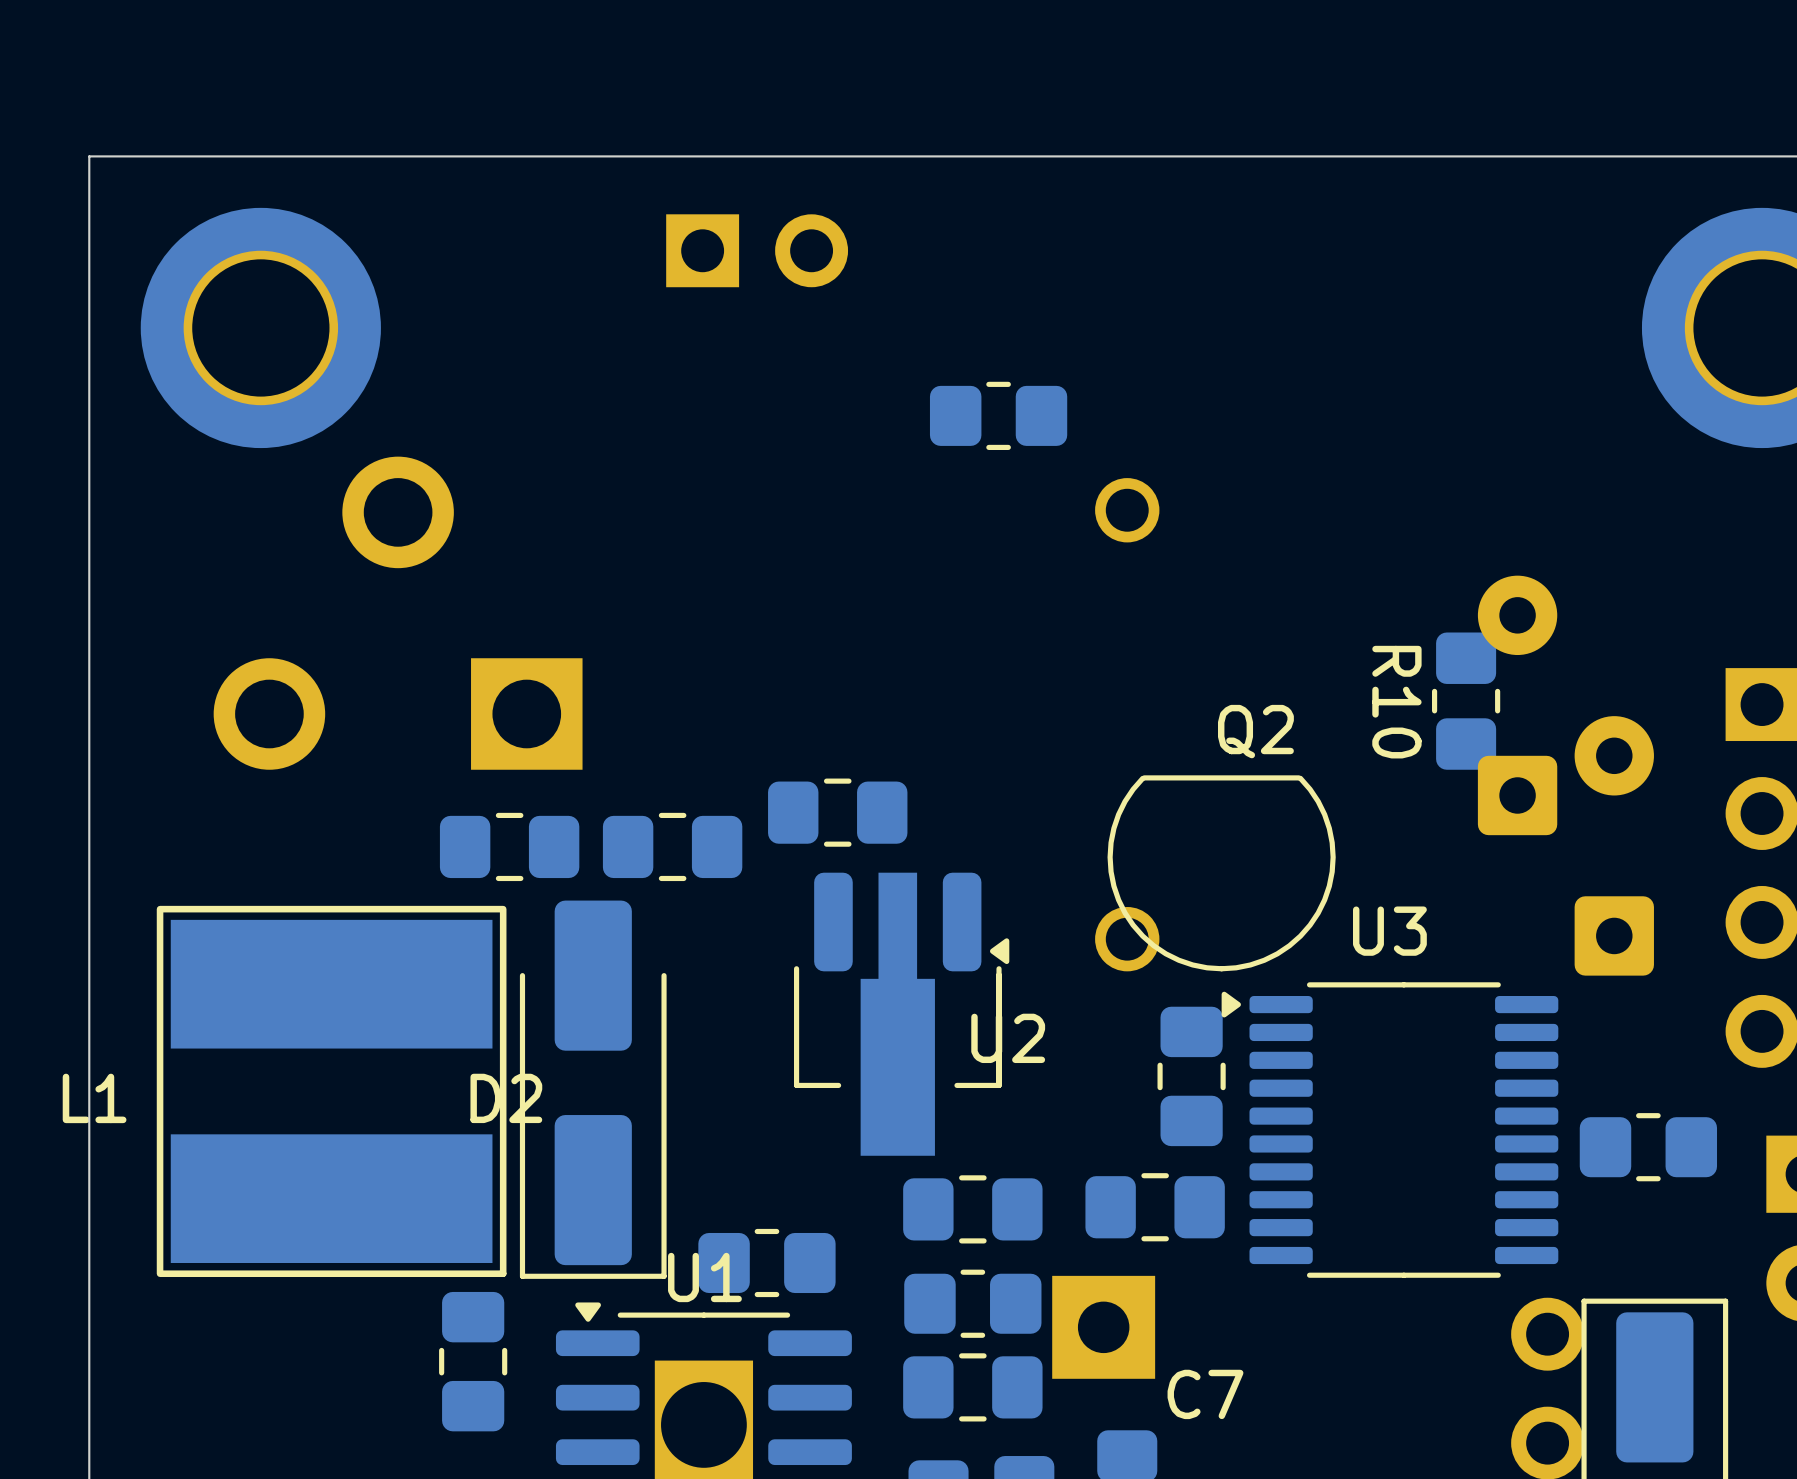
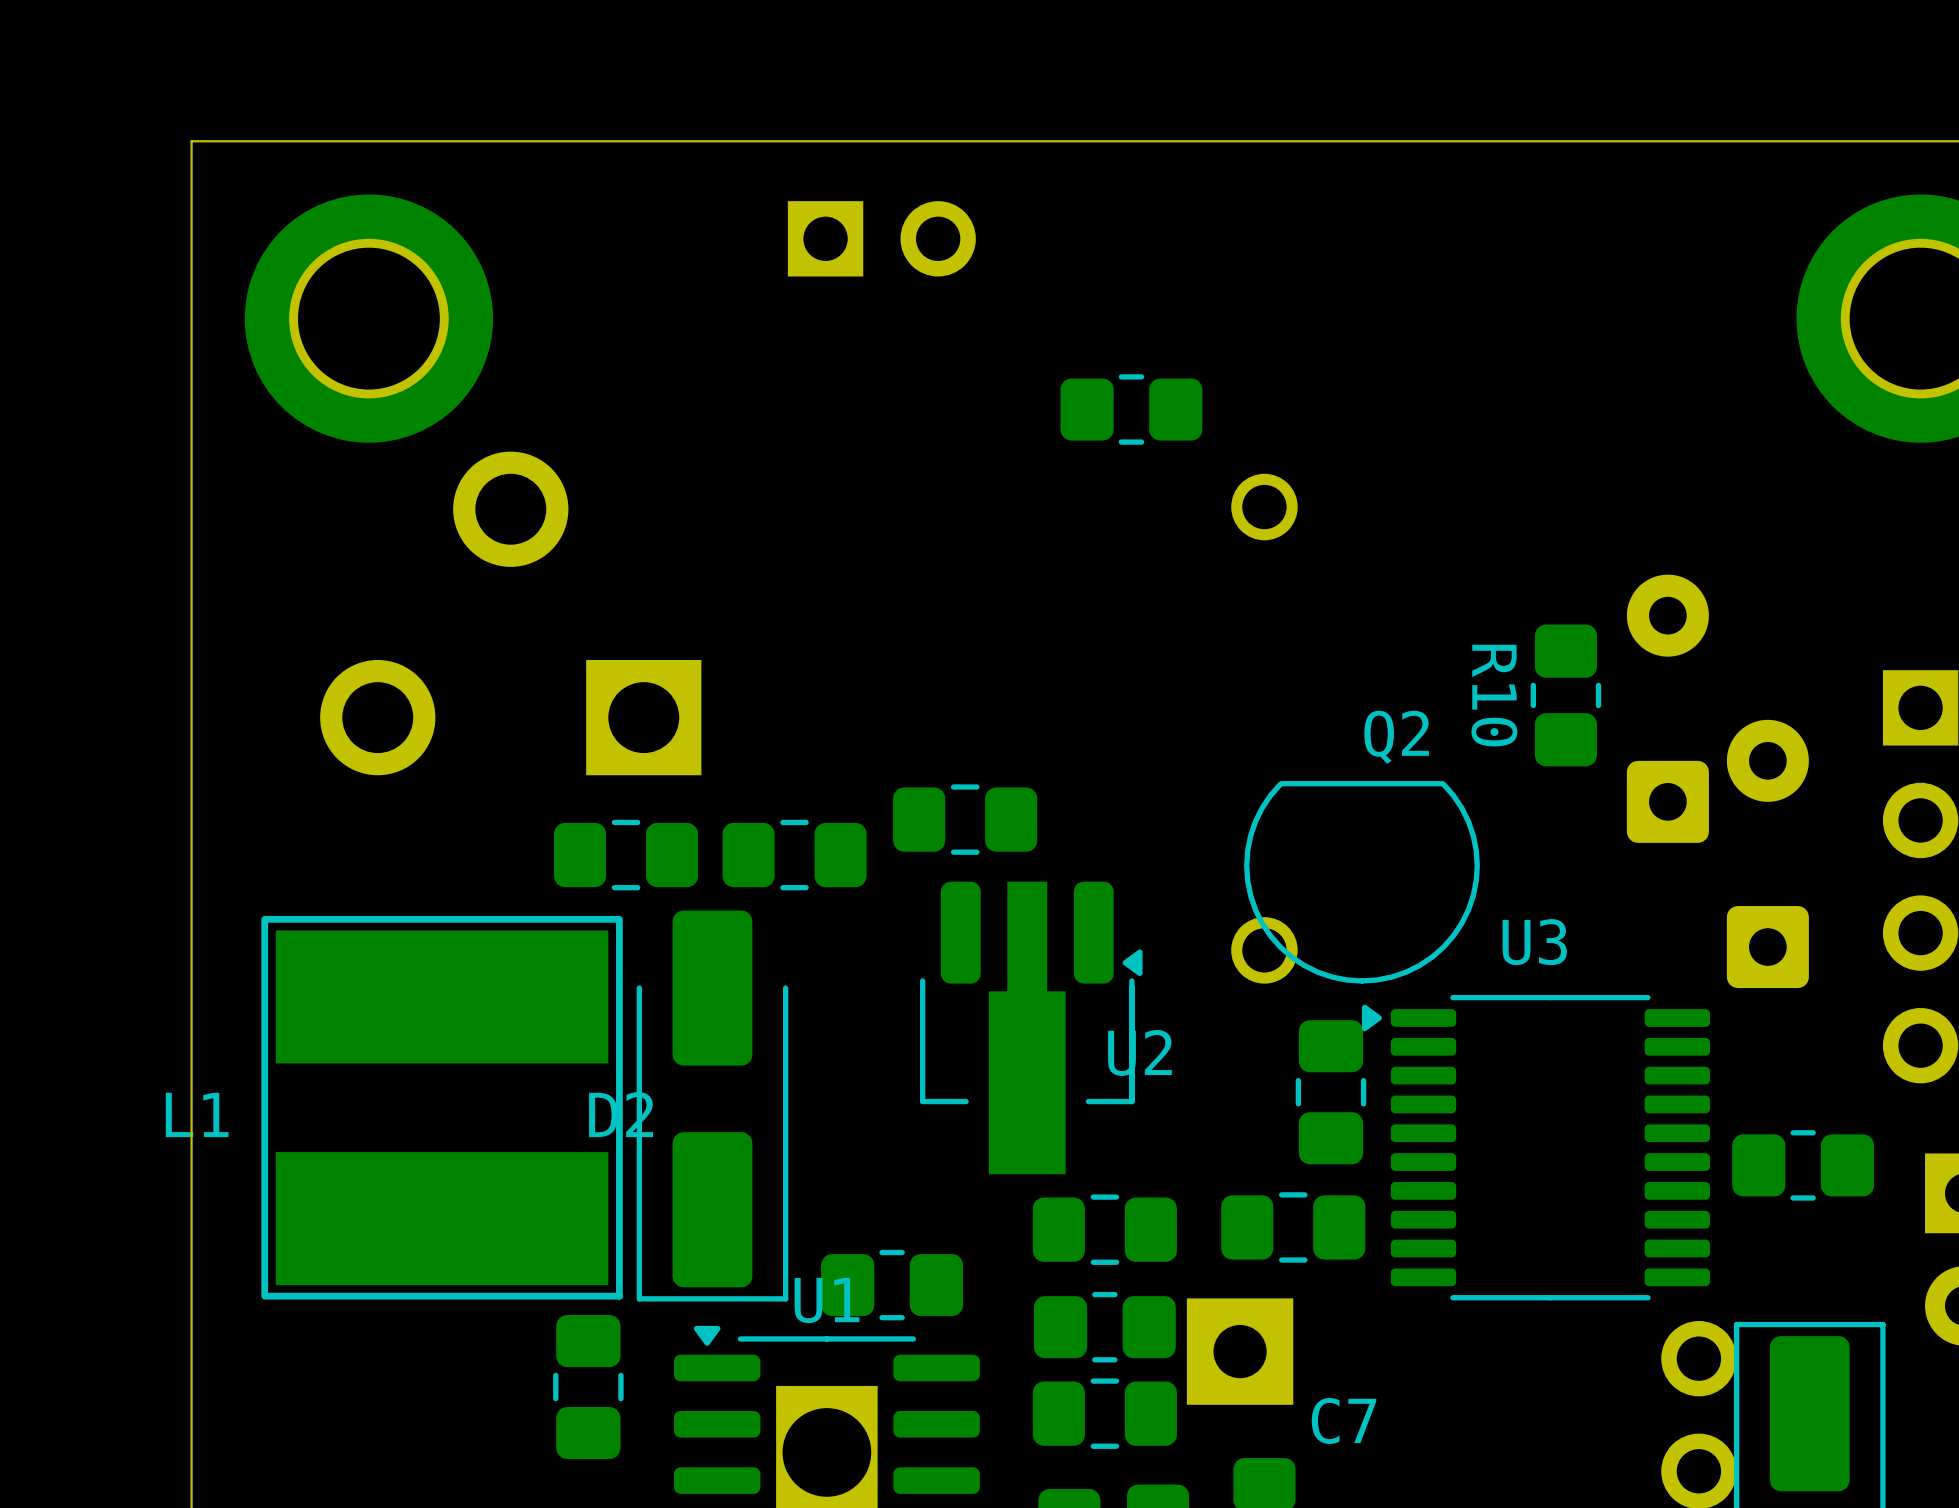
R10 position: (1466, 701) -> (1565, 695)

